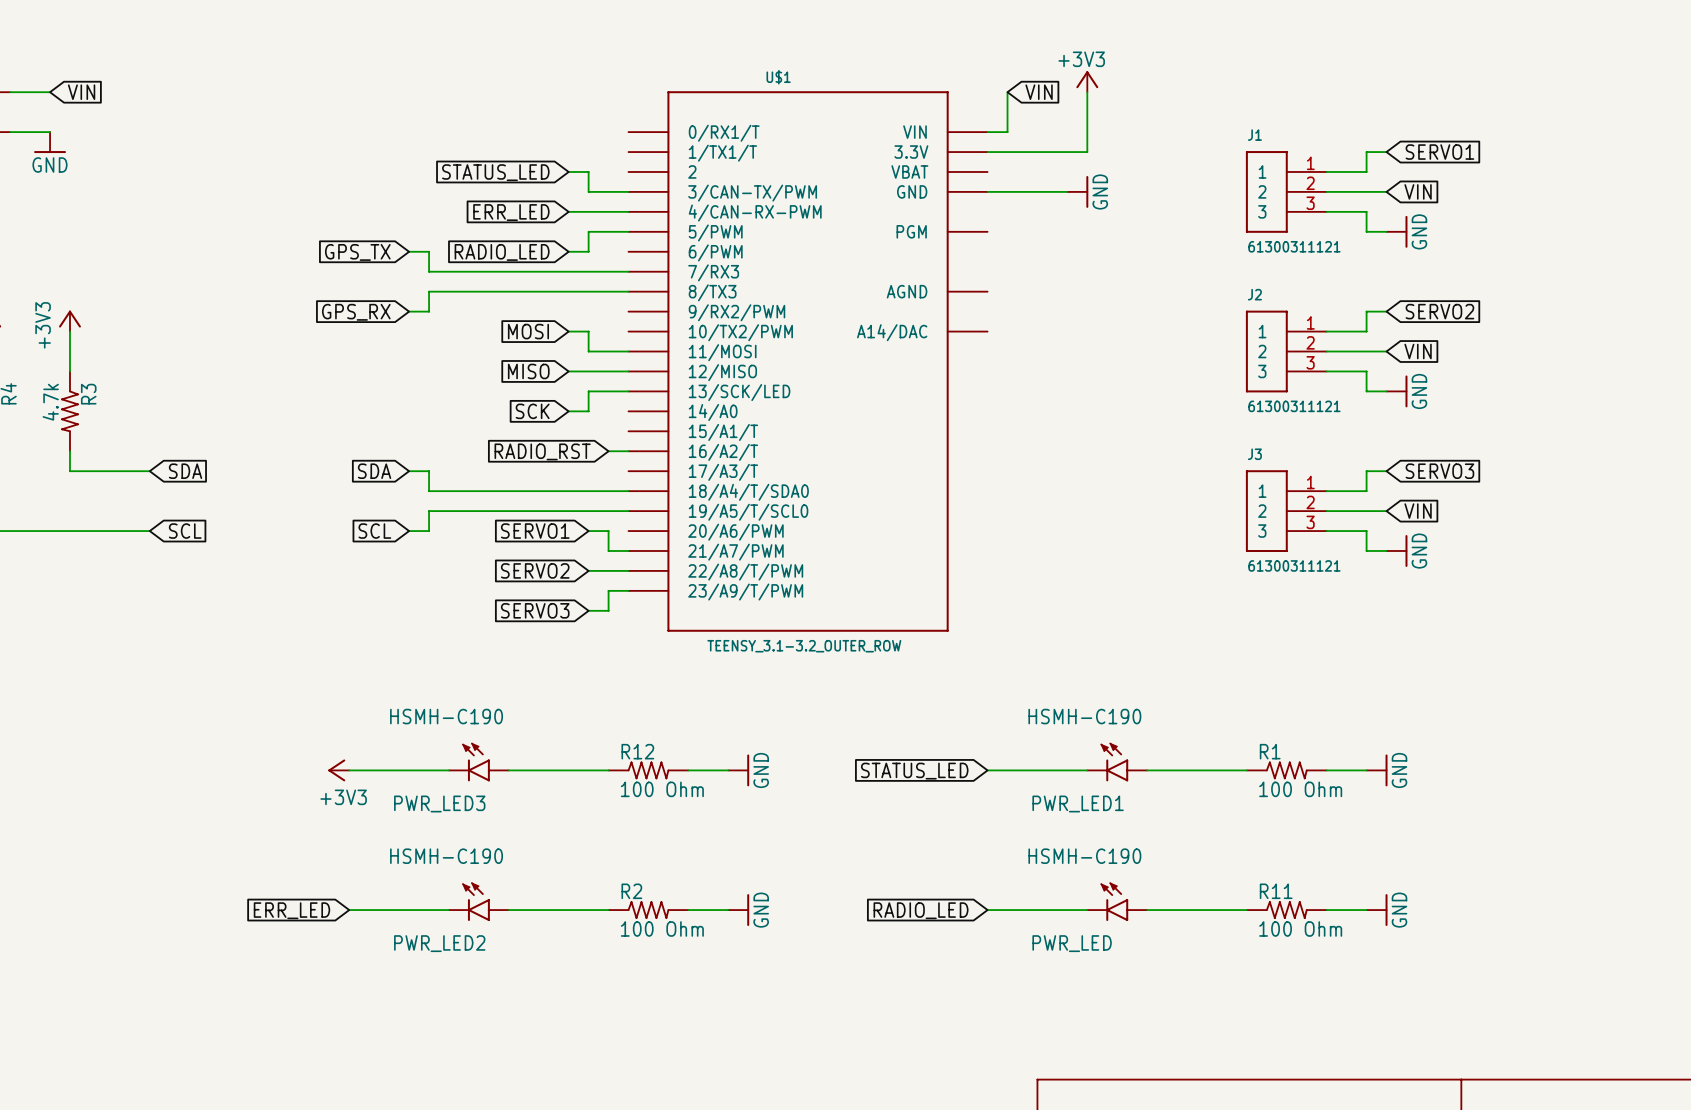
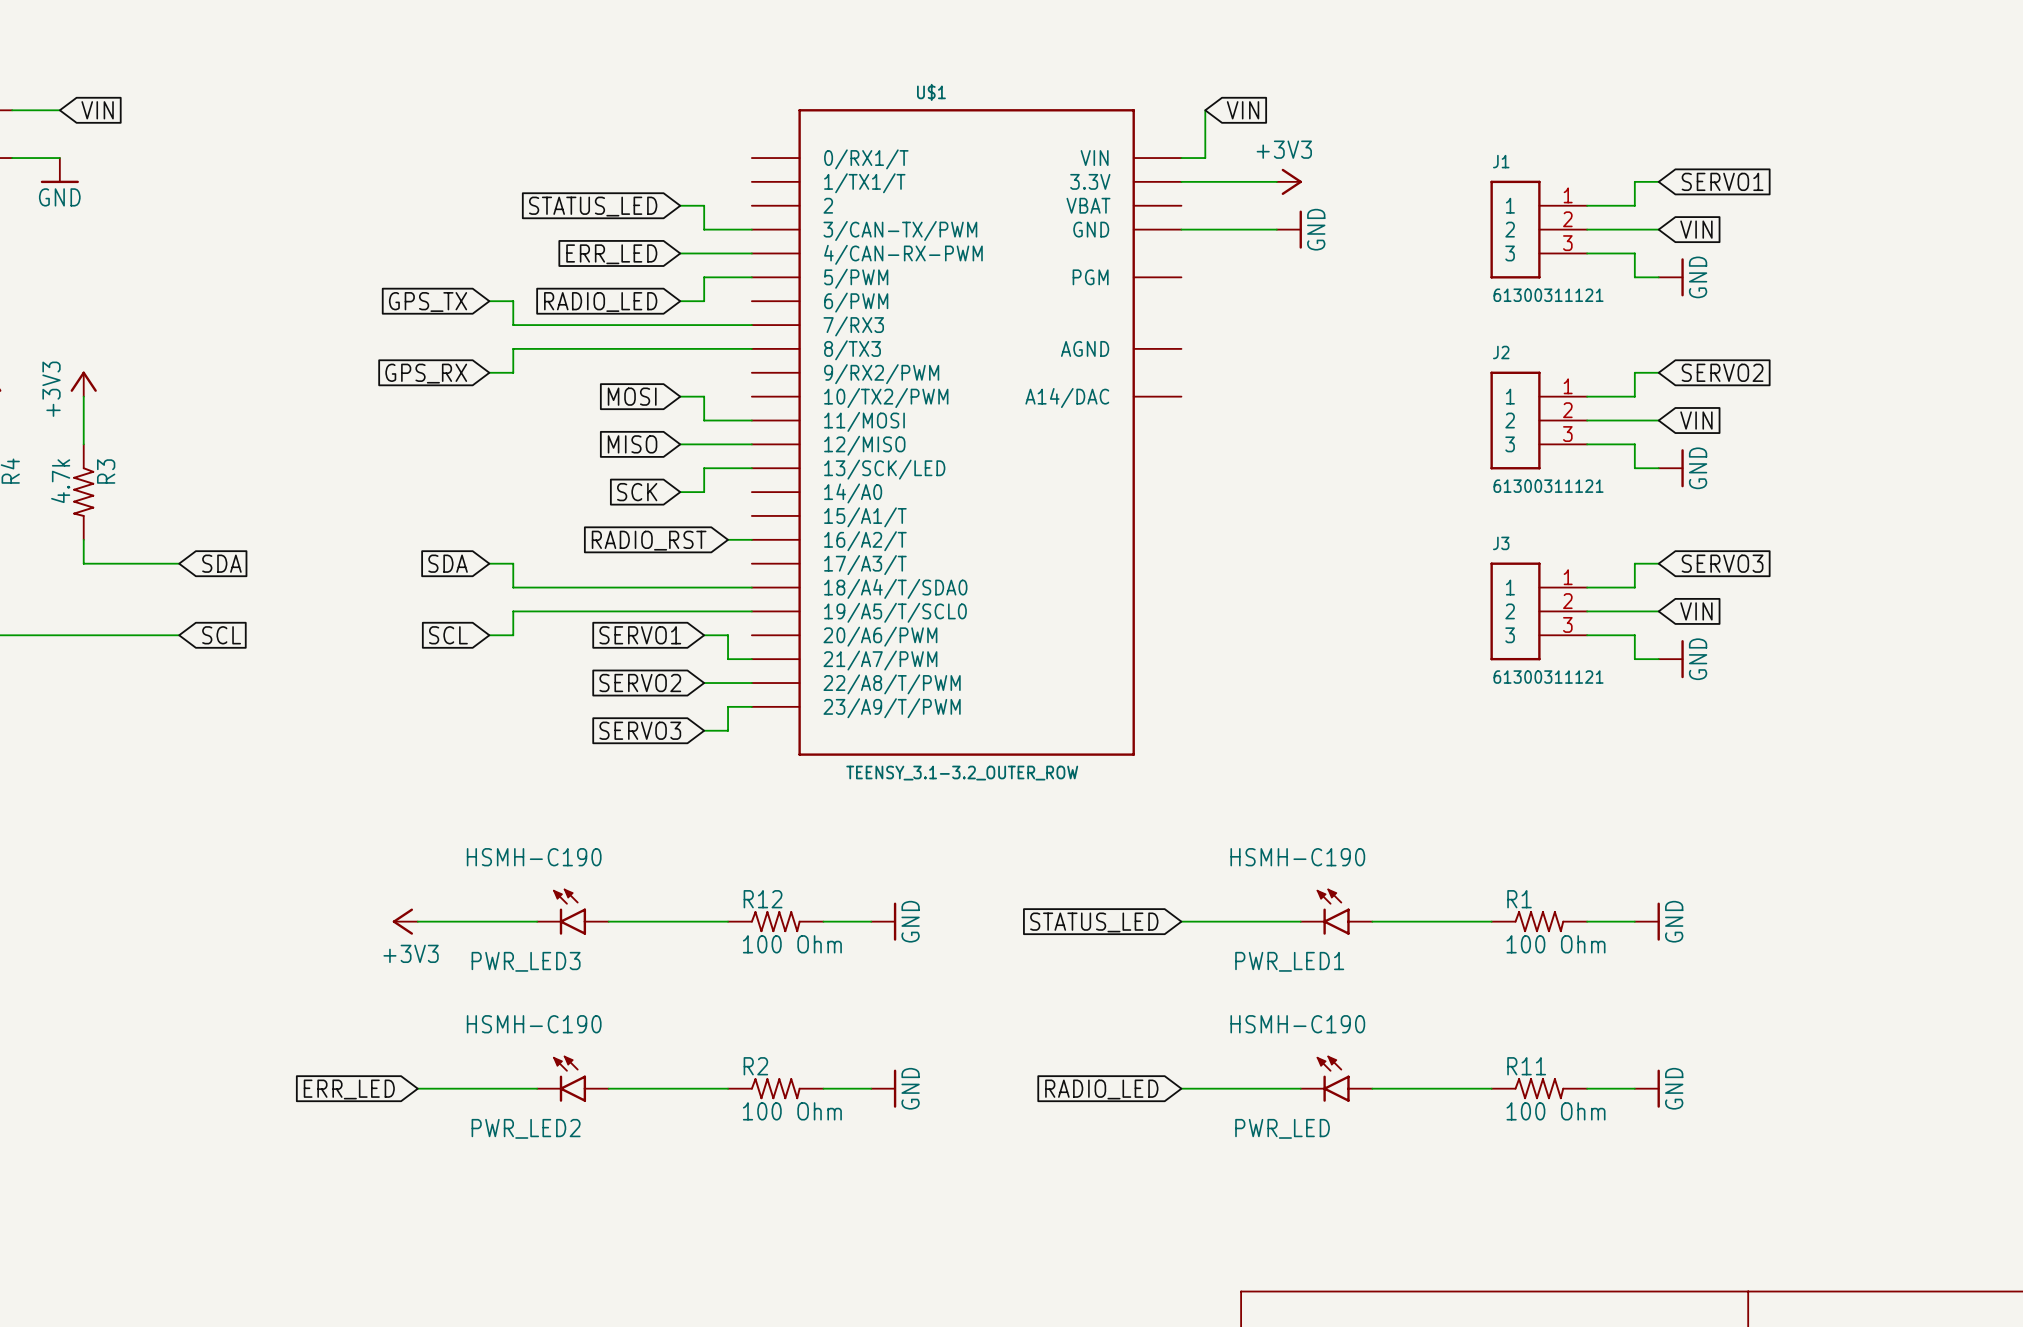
power symbol rotation: 0° (1087, 79) -> 90° clockwise (1291, 181)
power symbol position: +3V3 (1087, 81) -> +3V3 (1289, 181)
wire: (1087, 92) (1087, 152) (1067, 152) -> none

